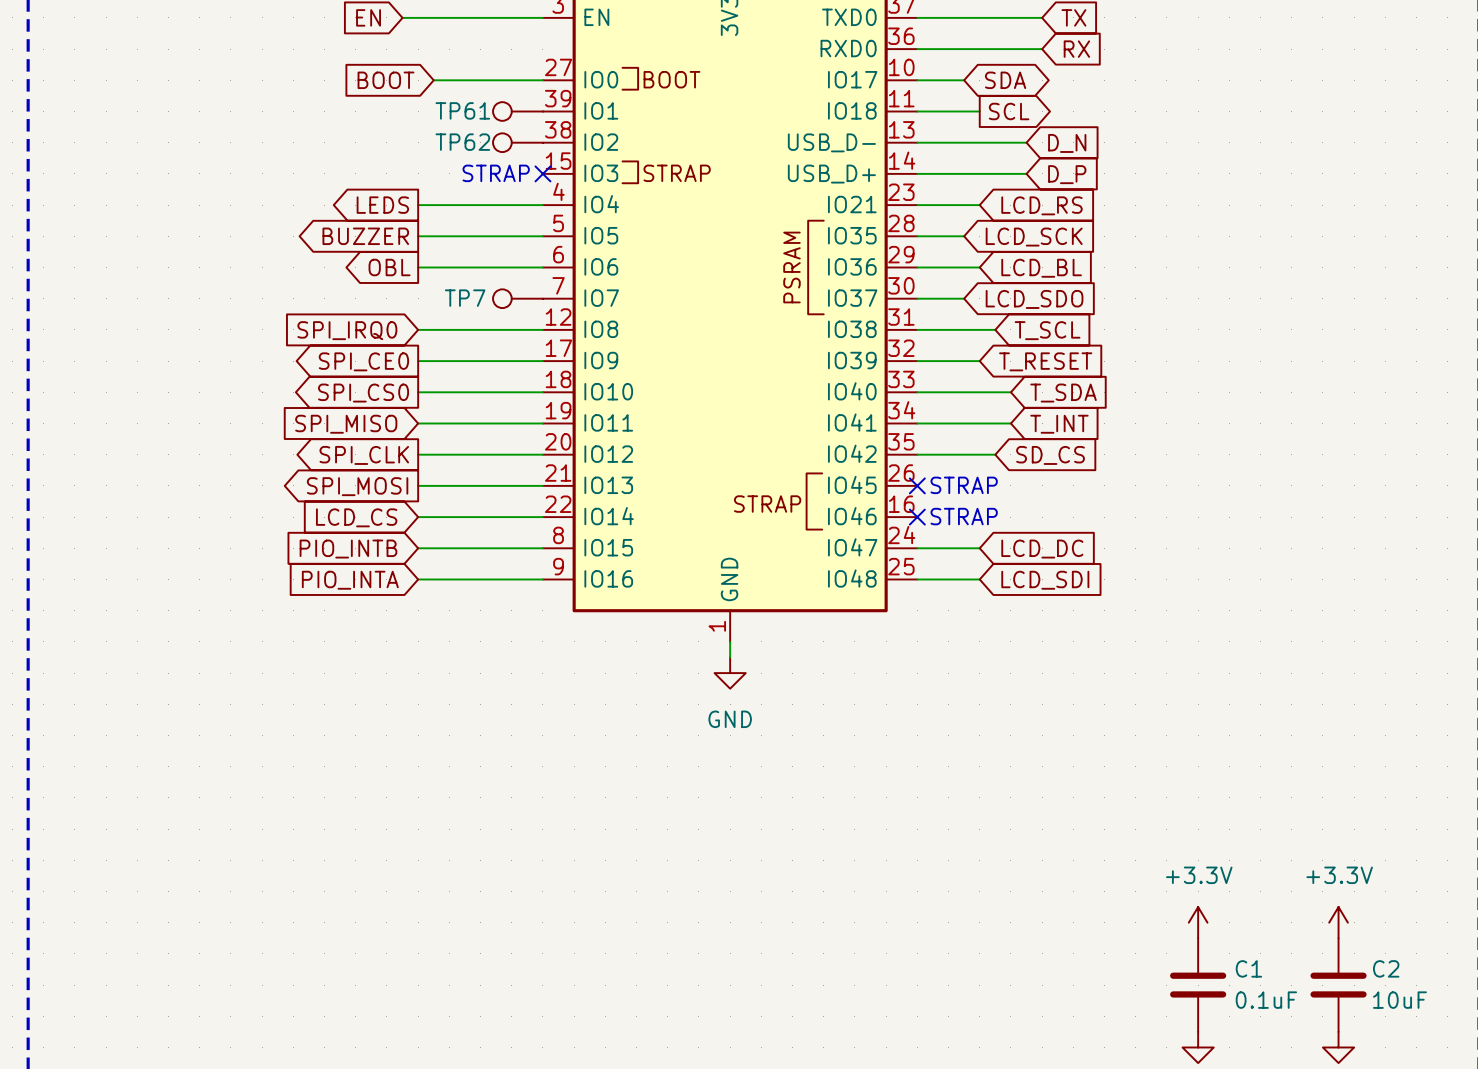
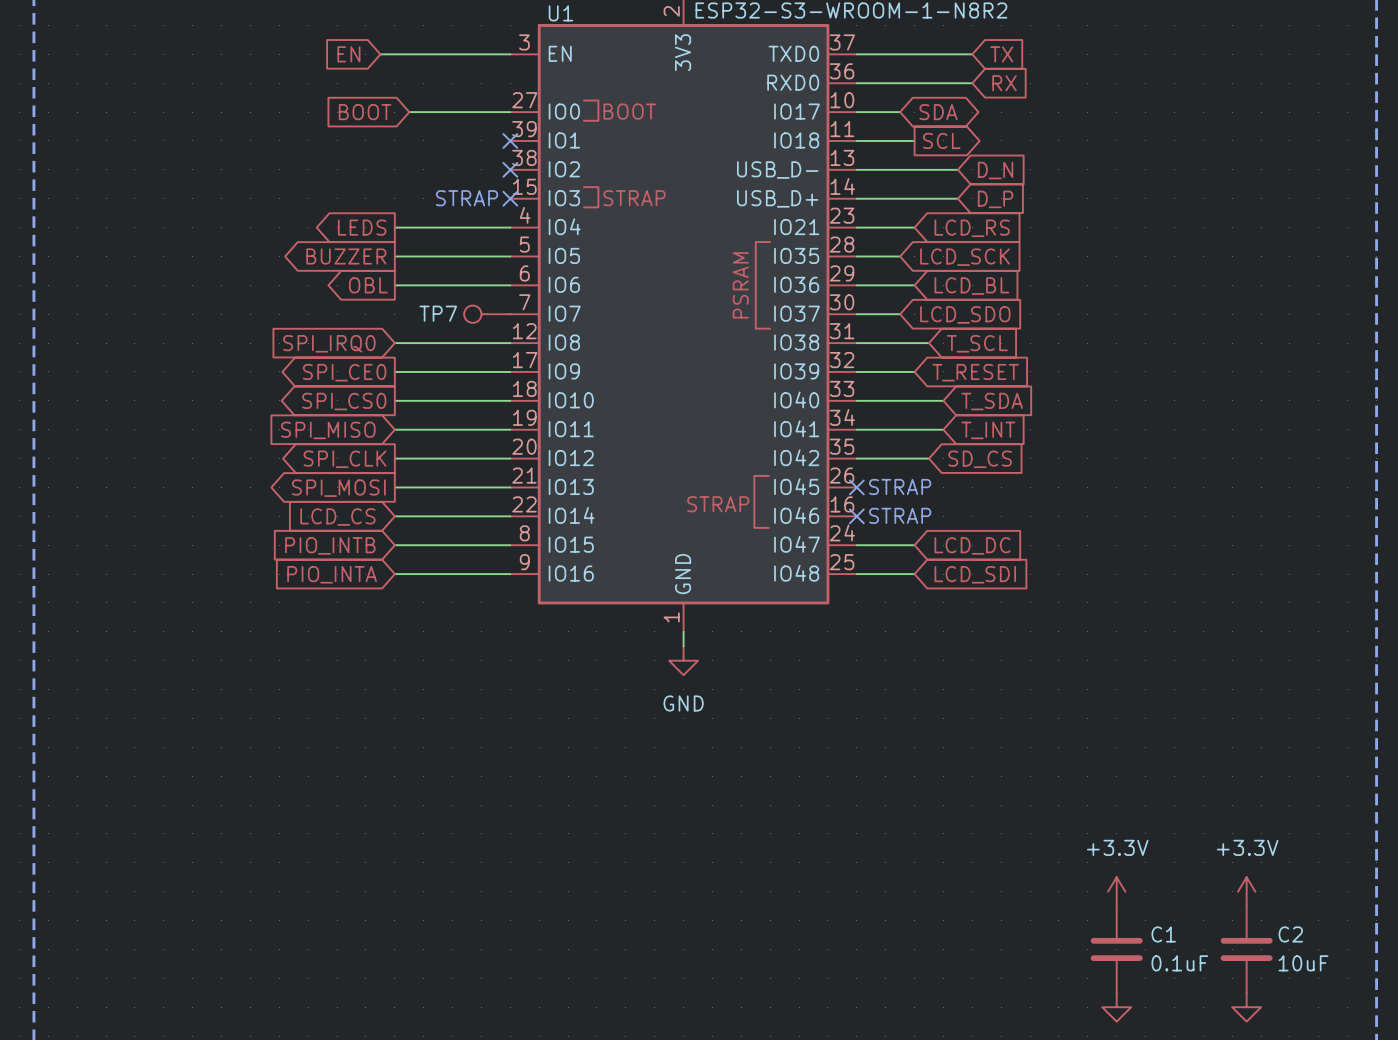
TP61: (517, 111) -> none
no-connect mark: none -> (510, 140)
TP62: (517, 142) -> none
no-connect mark: none -> (510, 169)

